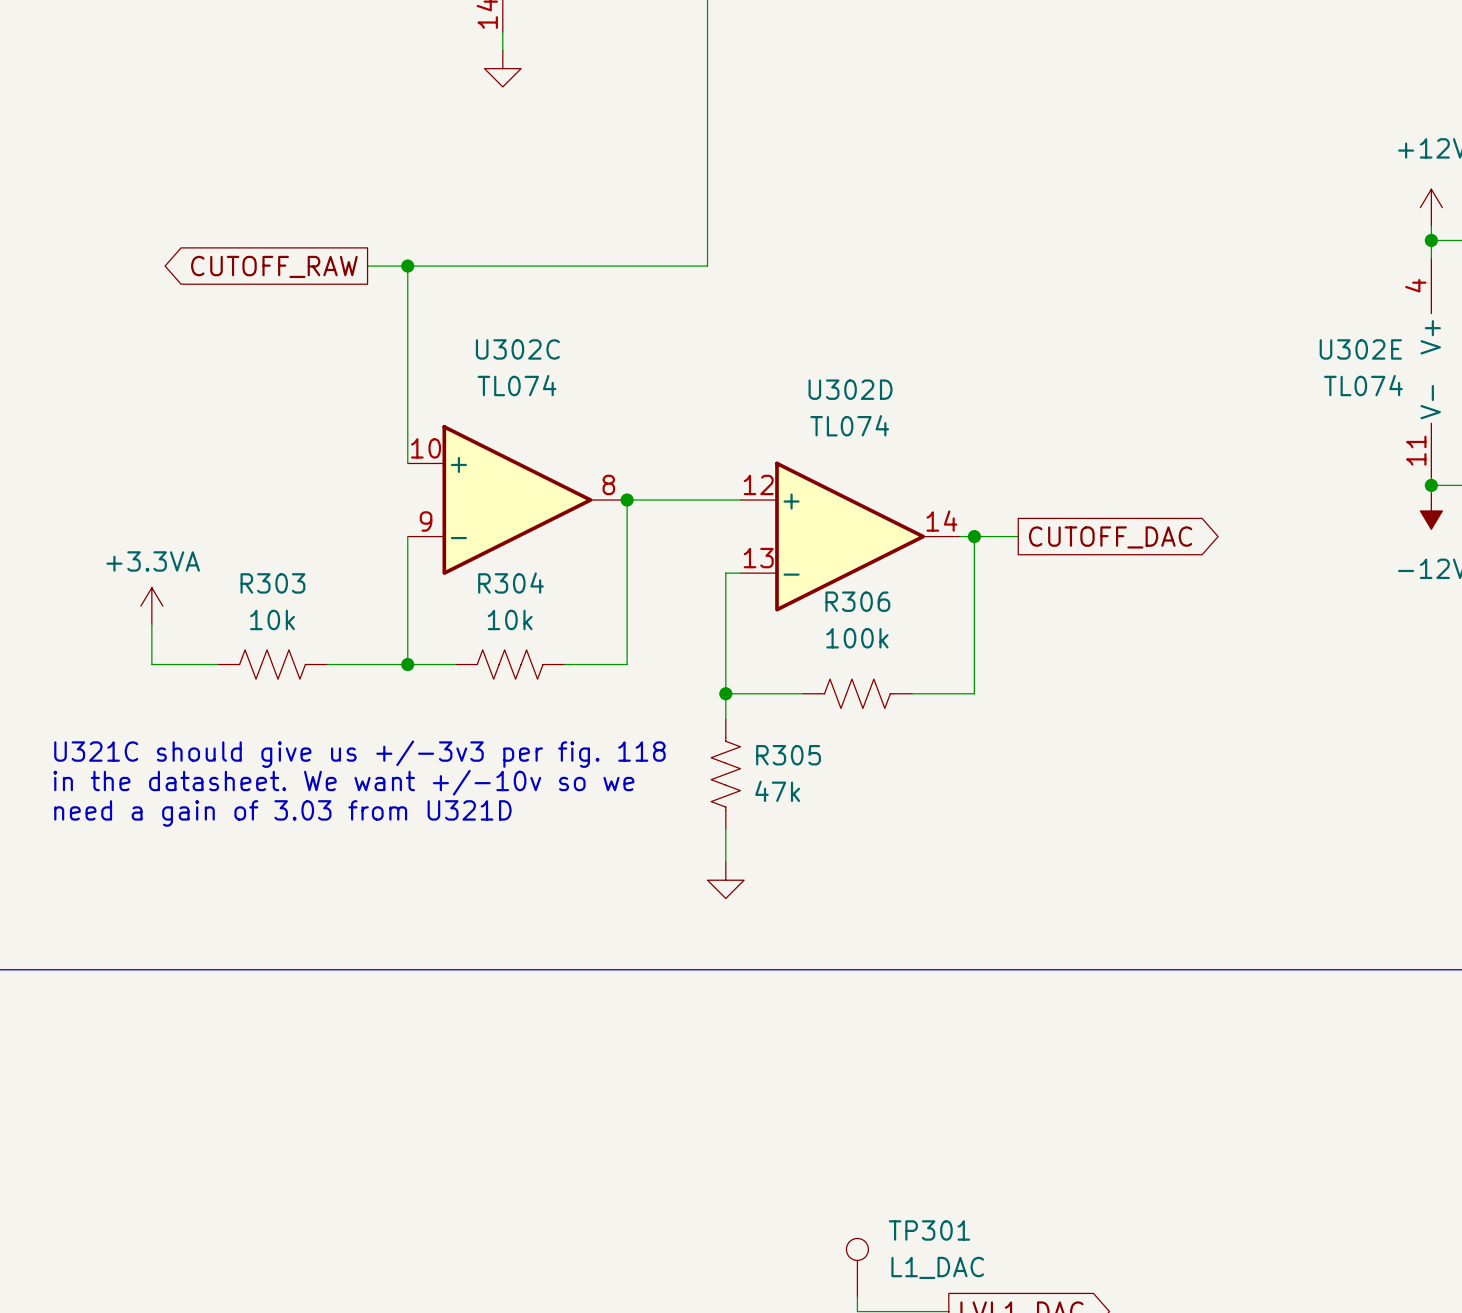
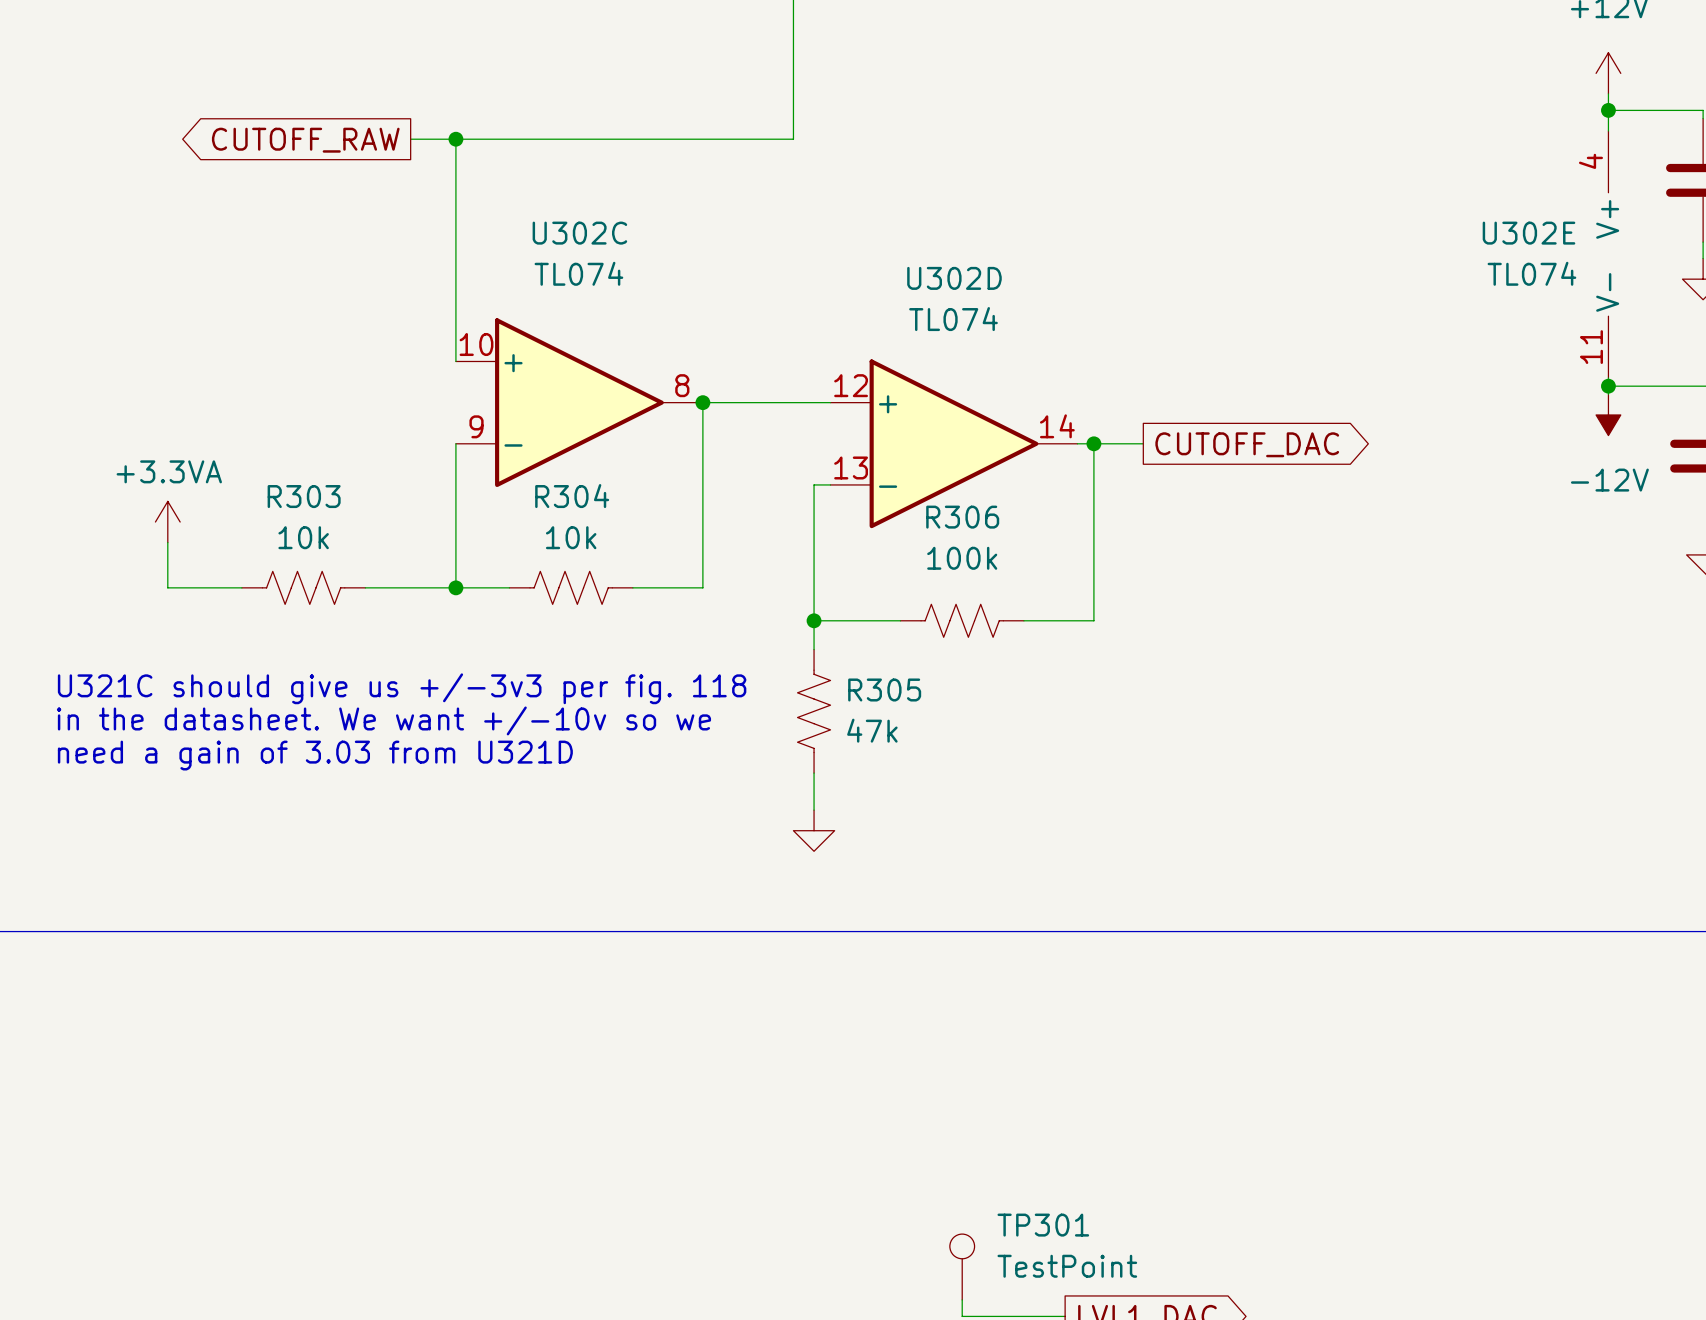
TP301 value: L1_DAC (937, 1267) -> TestPoint (1067, 1266)

